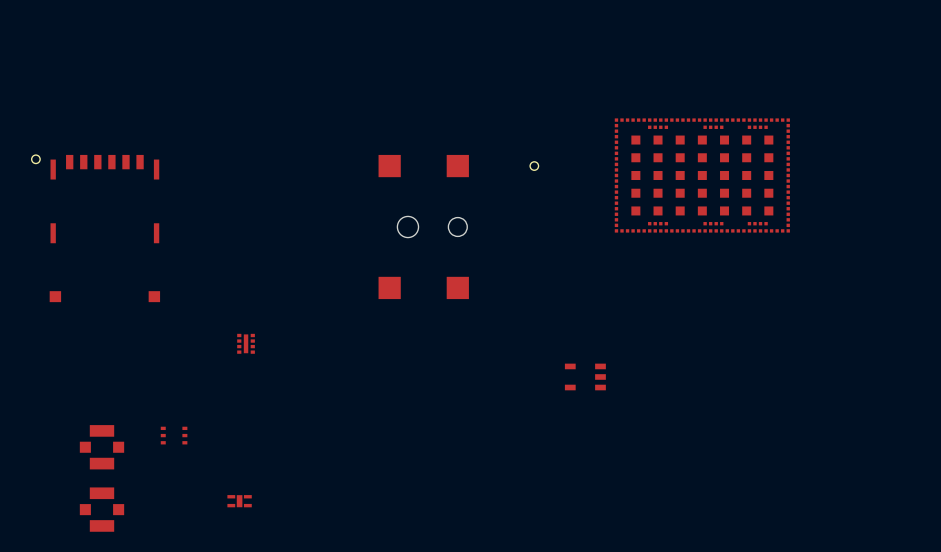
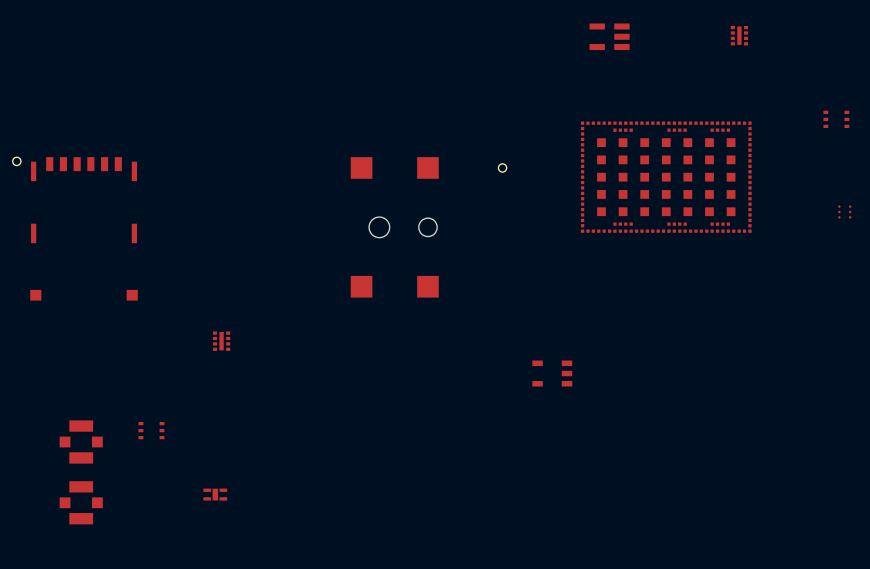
part: none -> (739, 35)
part: none -> (609, 36)
part: none -> (836, 119)
part: none -> (844, 211)

